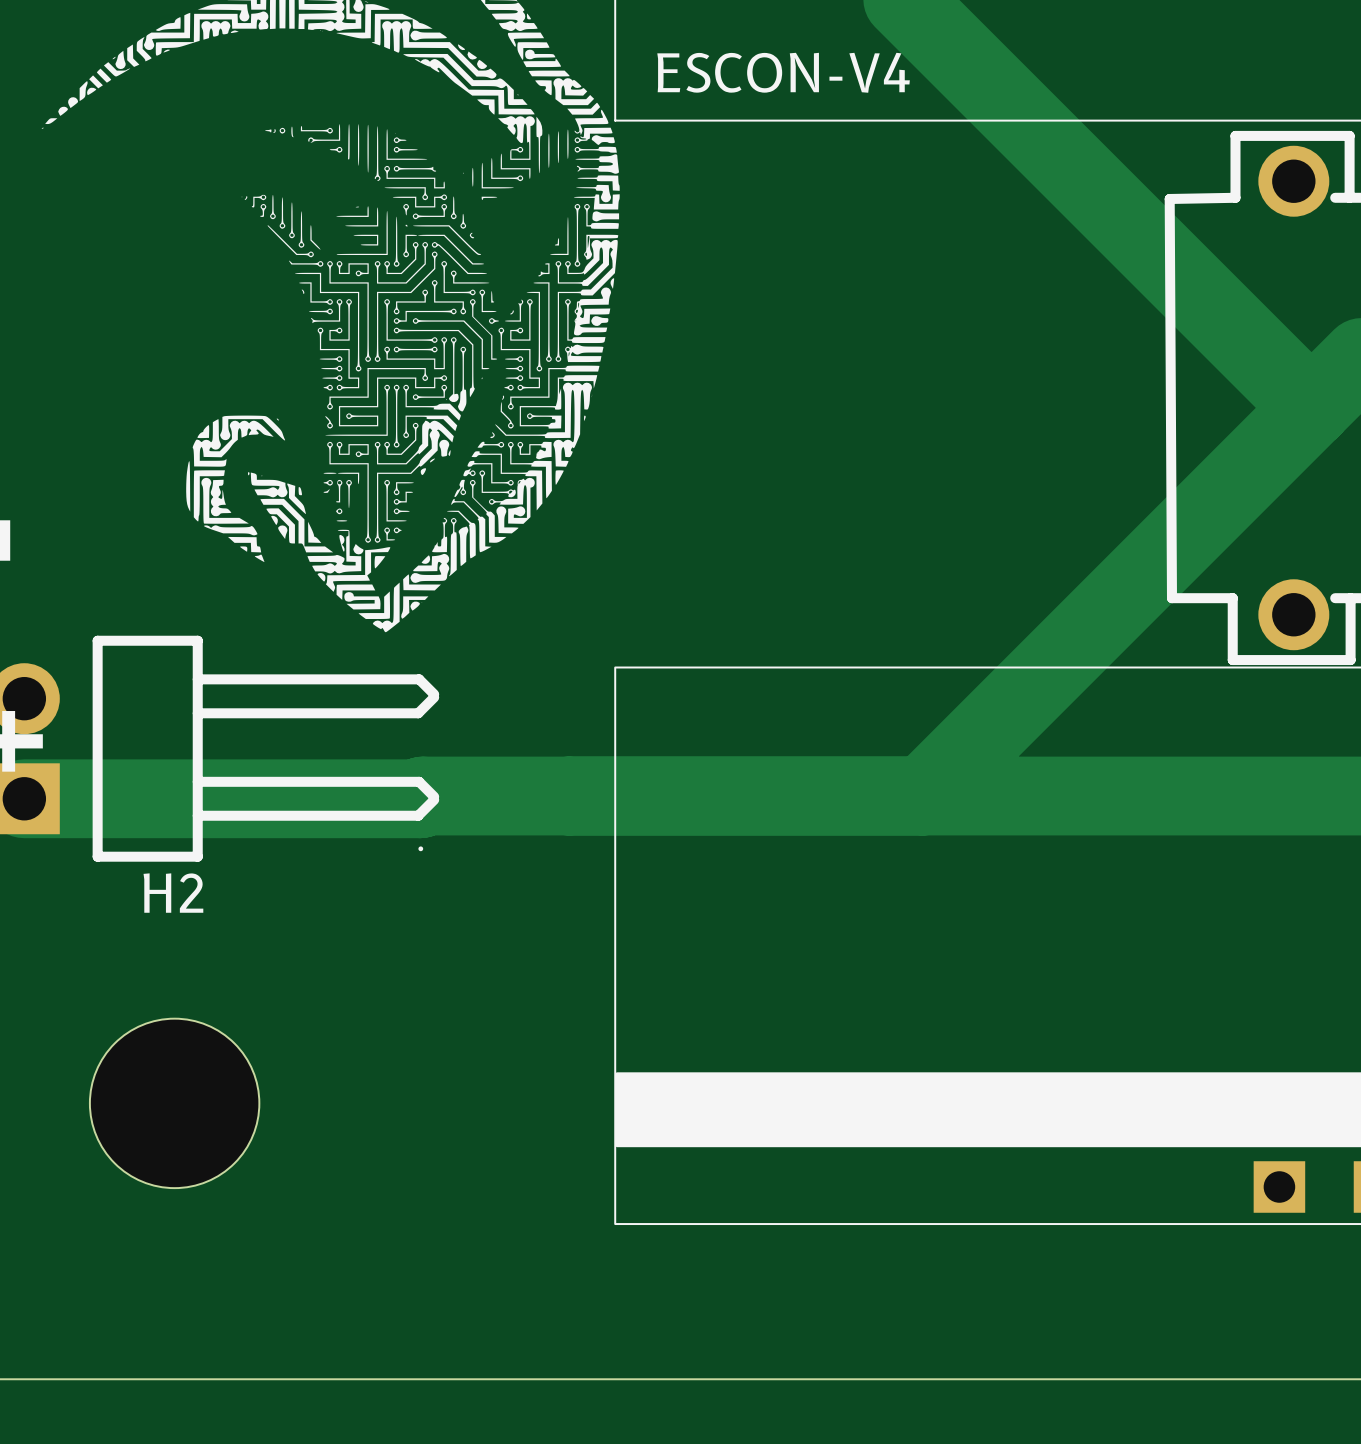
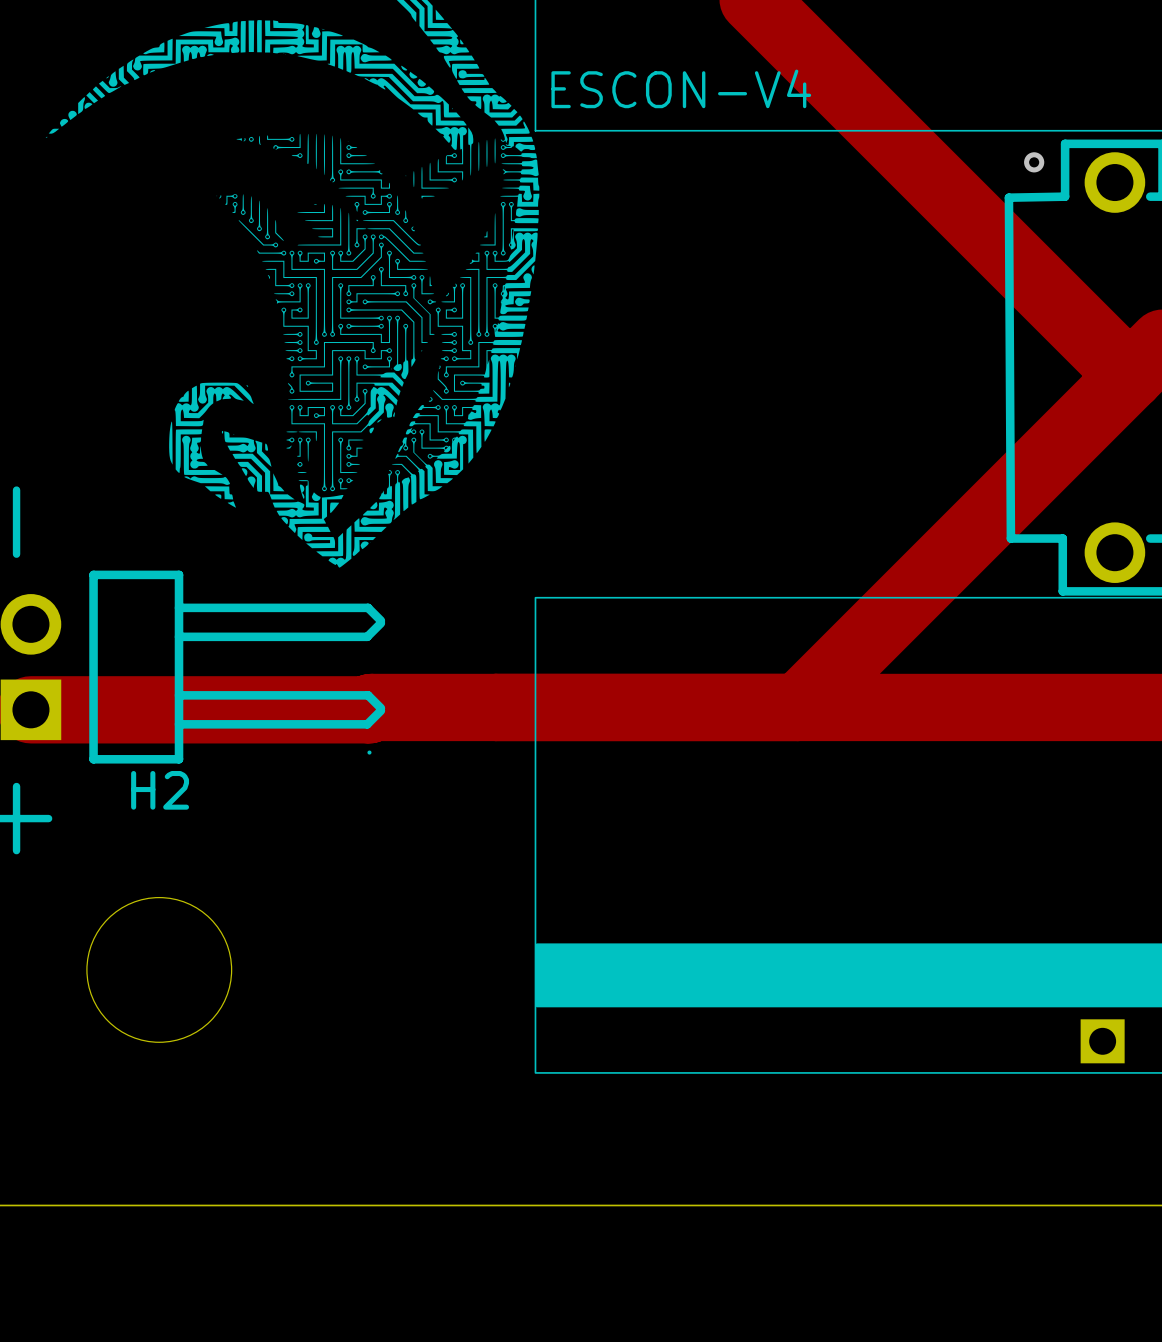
via: none -> (1034, 162)

